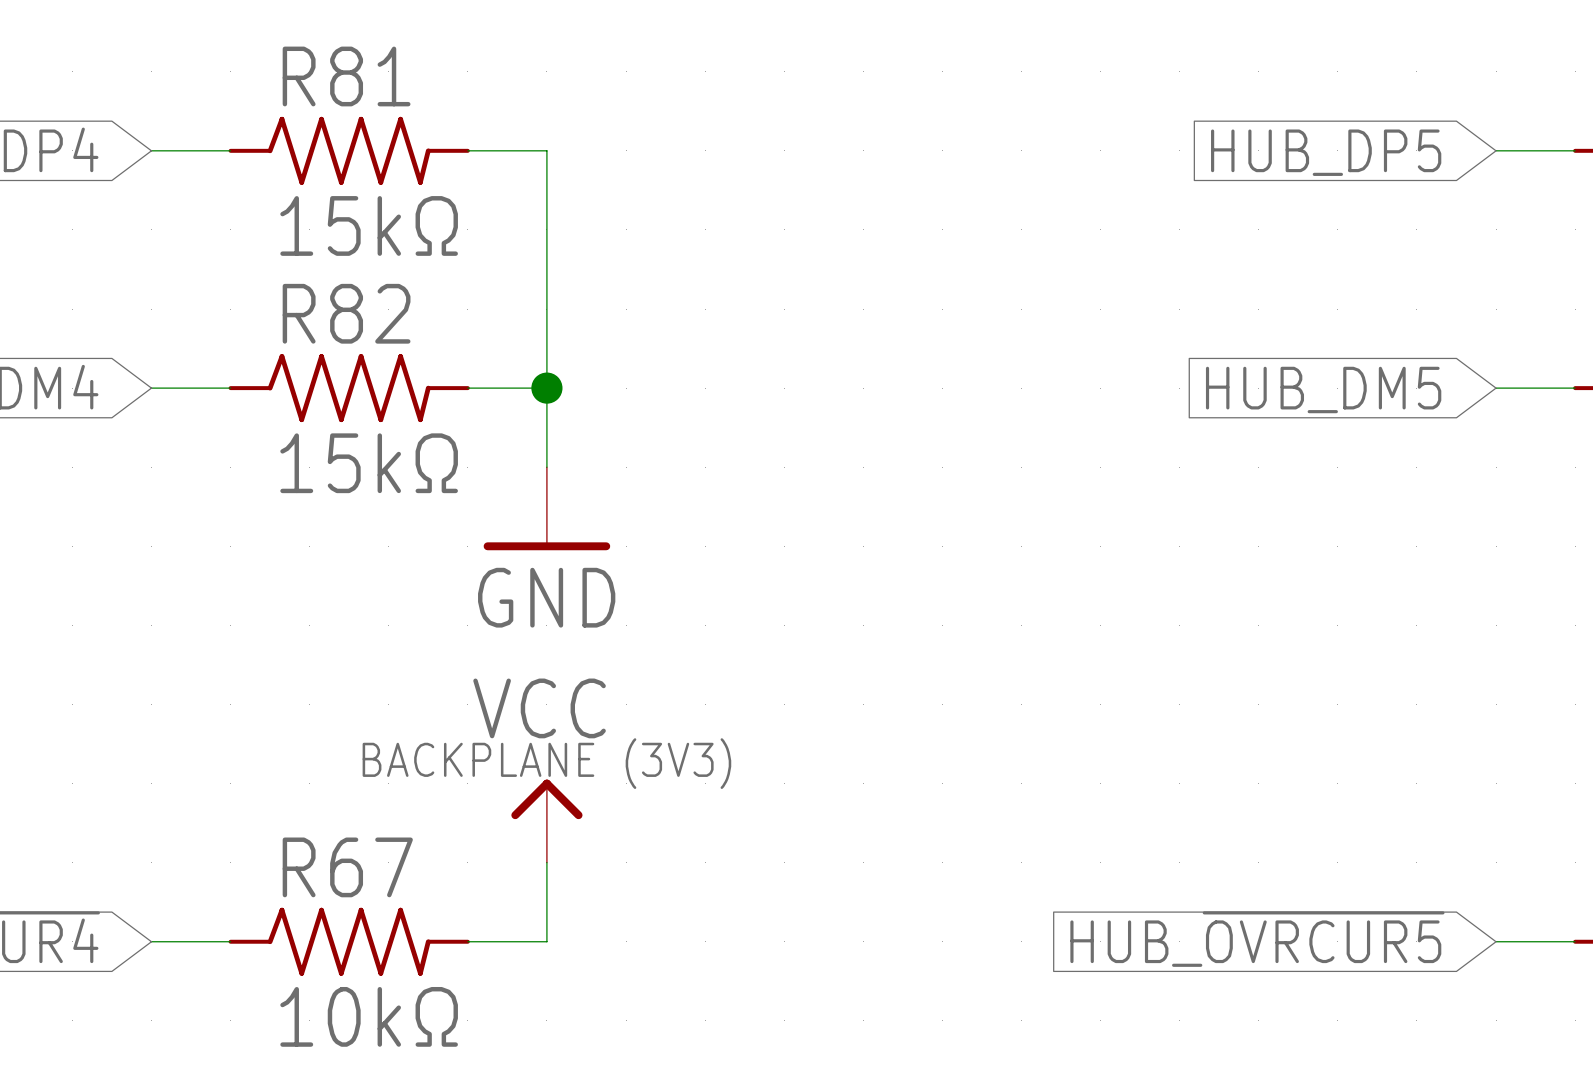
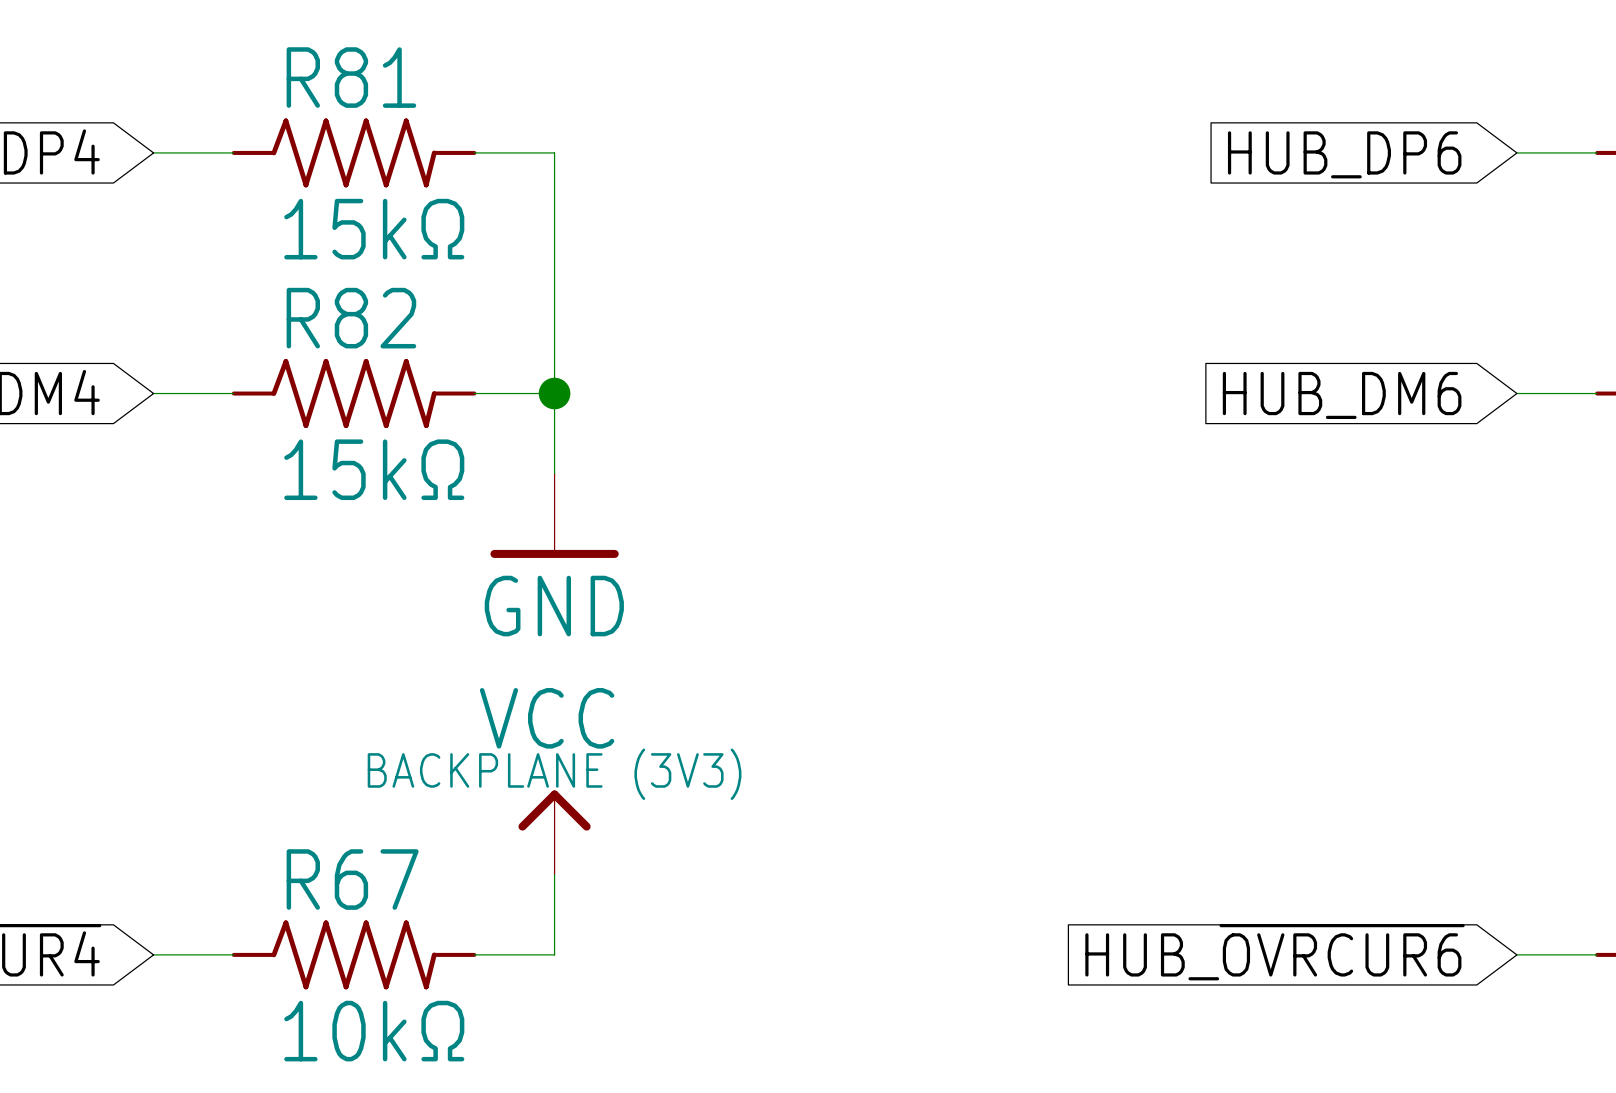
global label: HUB_DP5 (1326, 152) -> HUB_DP6 (1344, 154)
global label: HUB_DM5 (1323, 389) -> HUB_DM6 (1342, 395)
global label: HUB_~{OVRCUR5} (1257, 939) -> HUB_~{OVRCUR6} (1275, 952)

